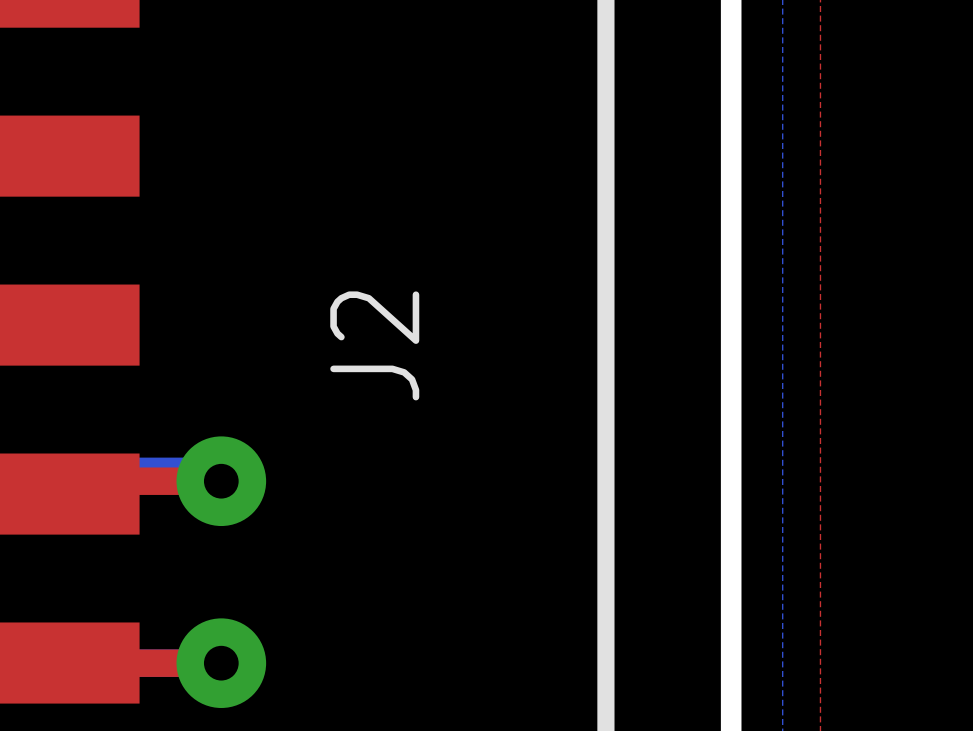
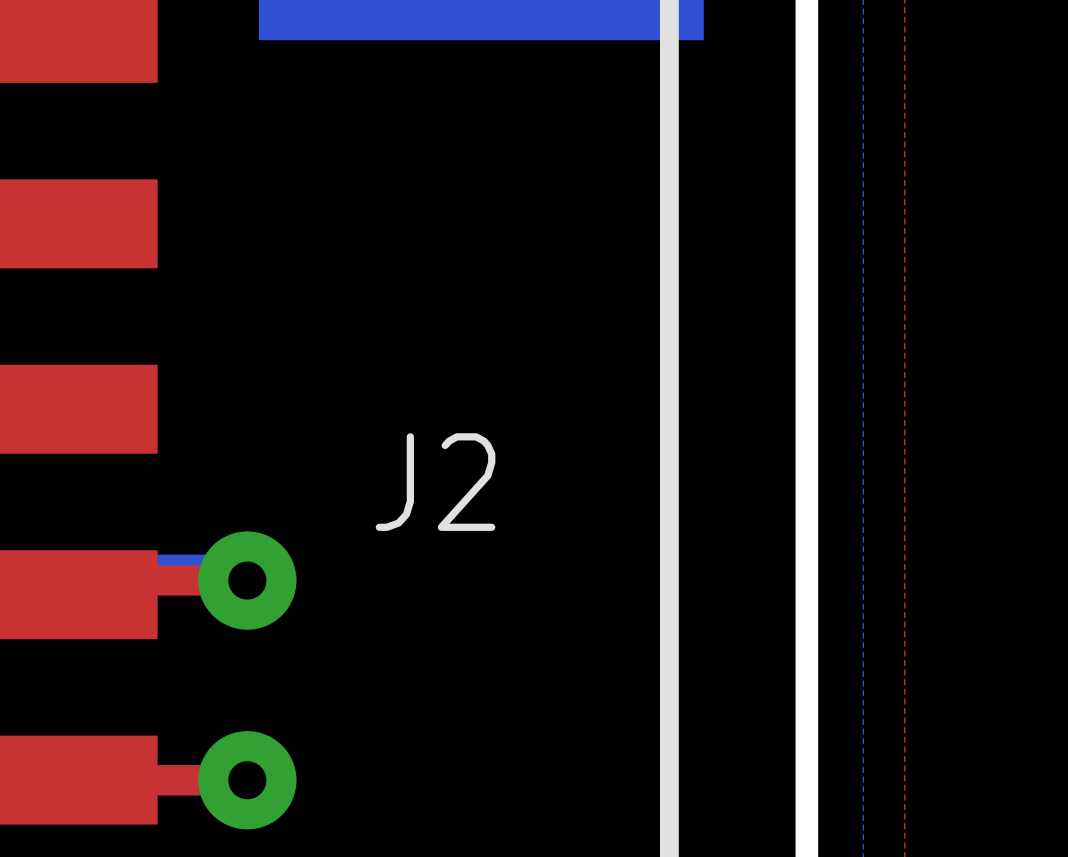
J2 name rotation: 0° (374, 345) -> 90° clockwise (435, 482)

